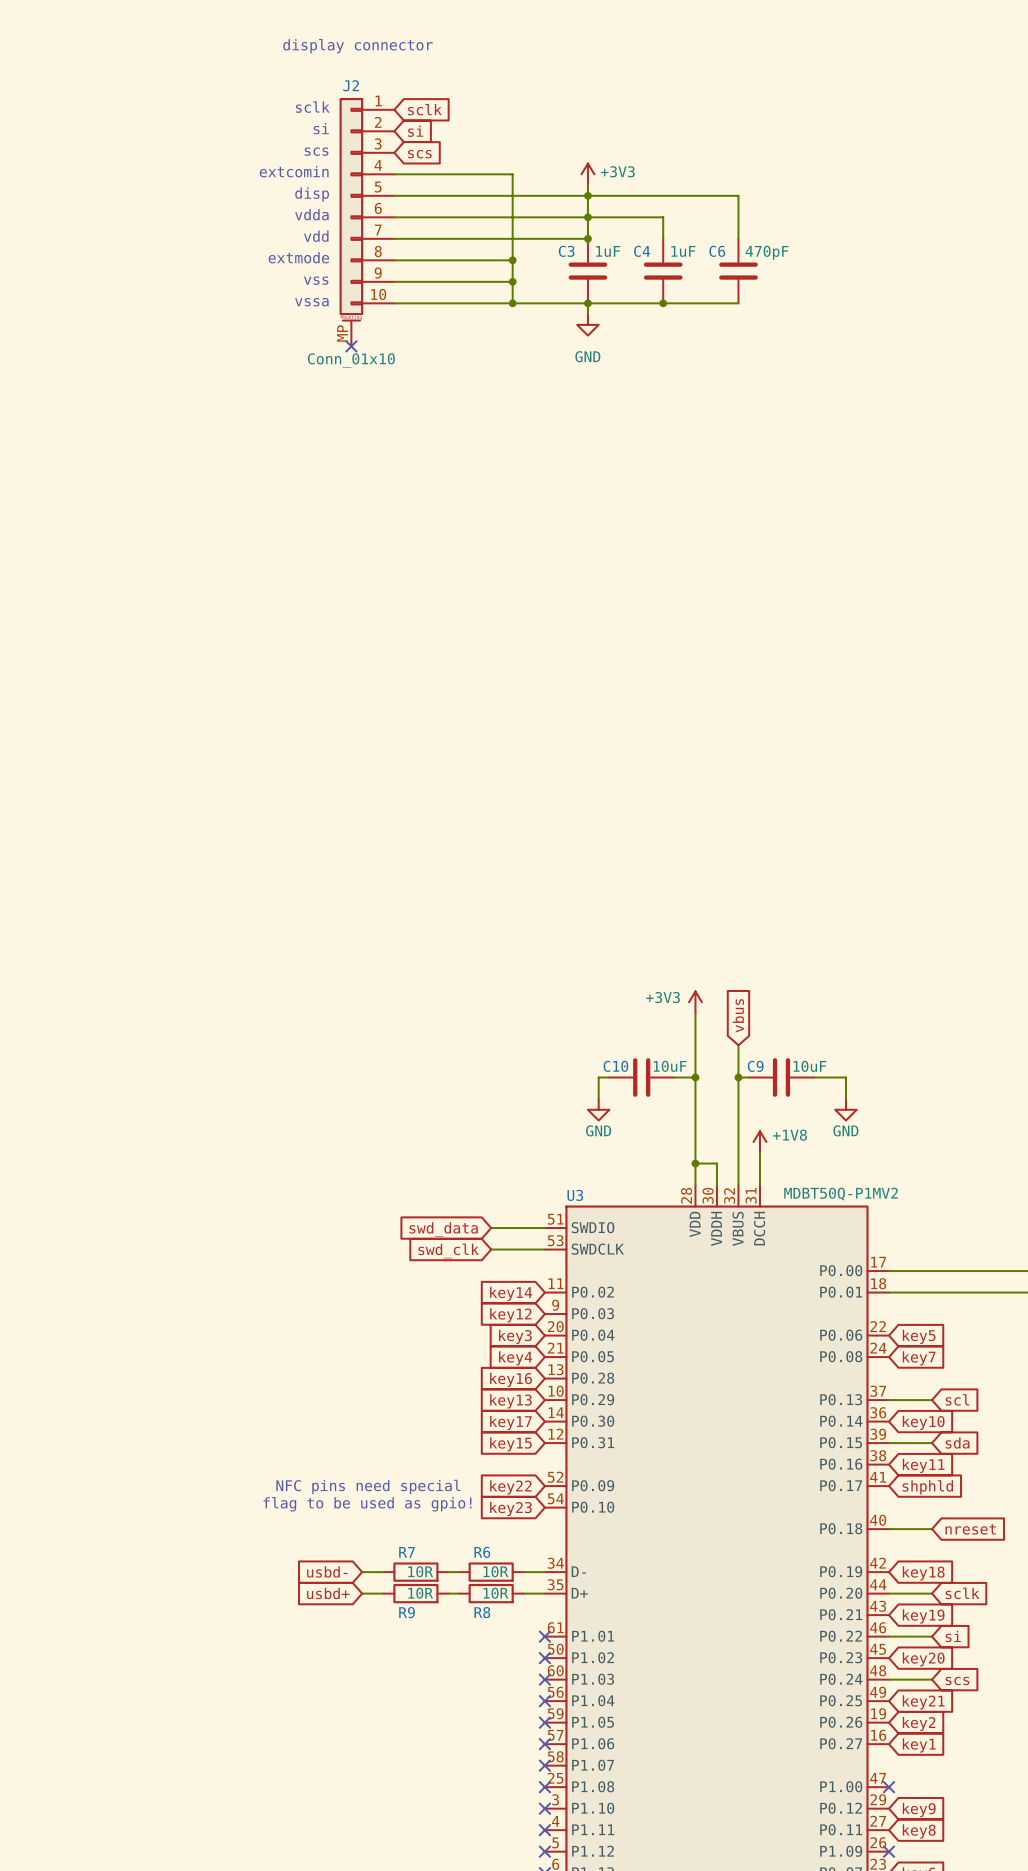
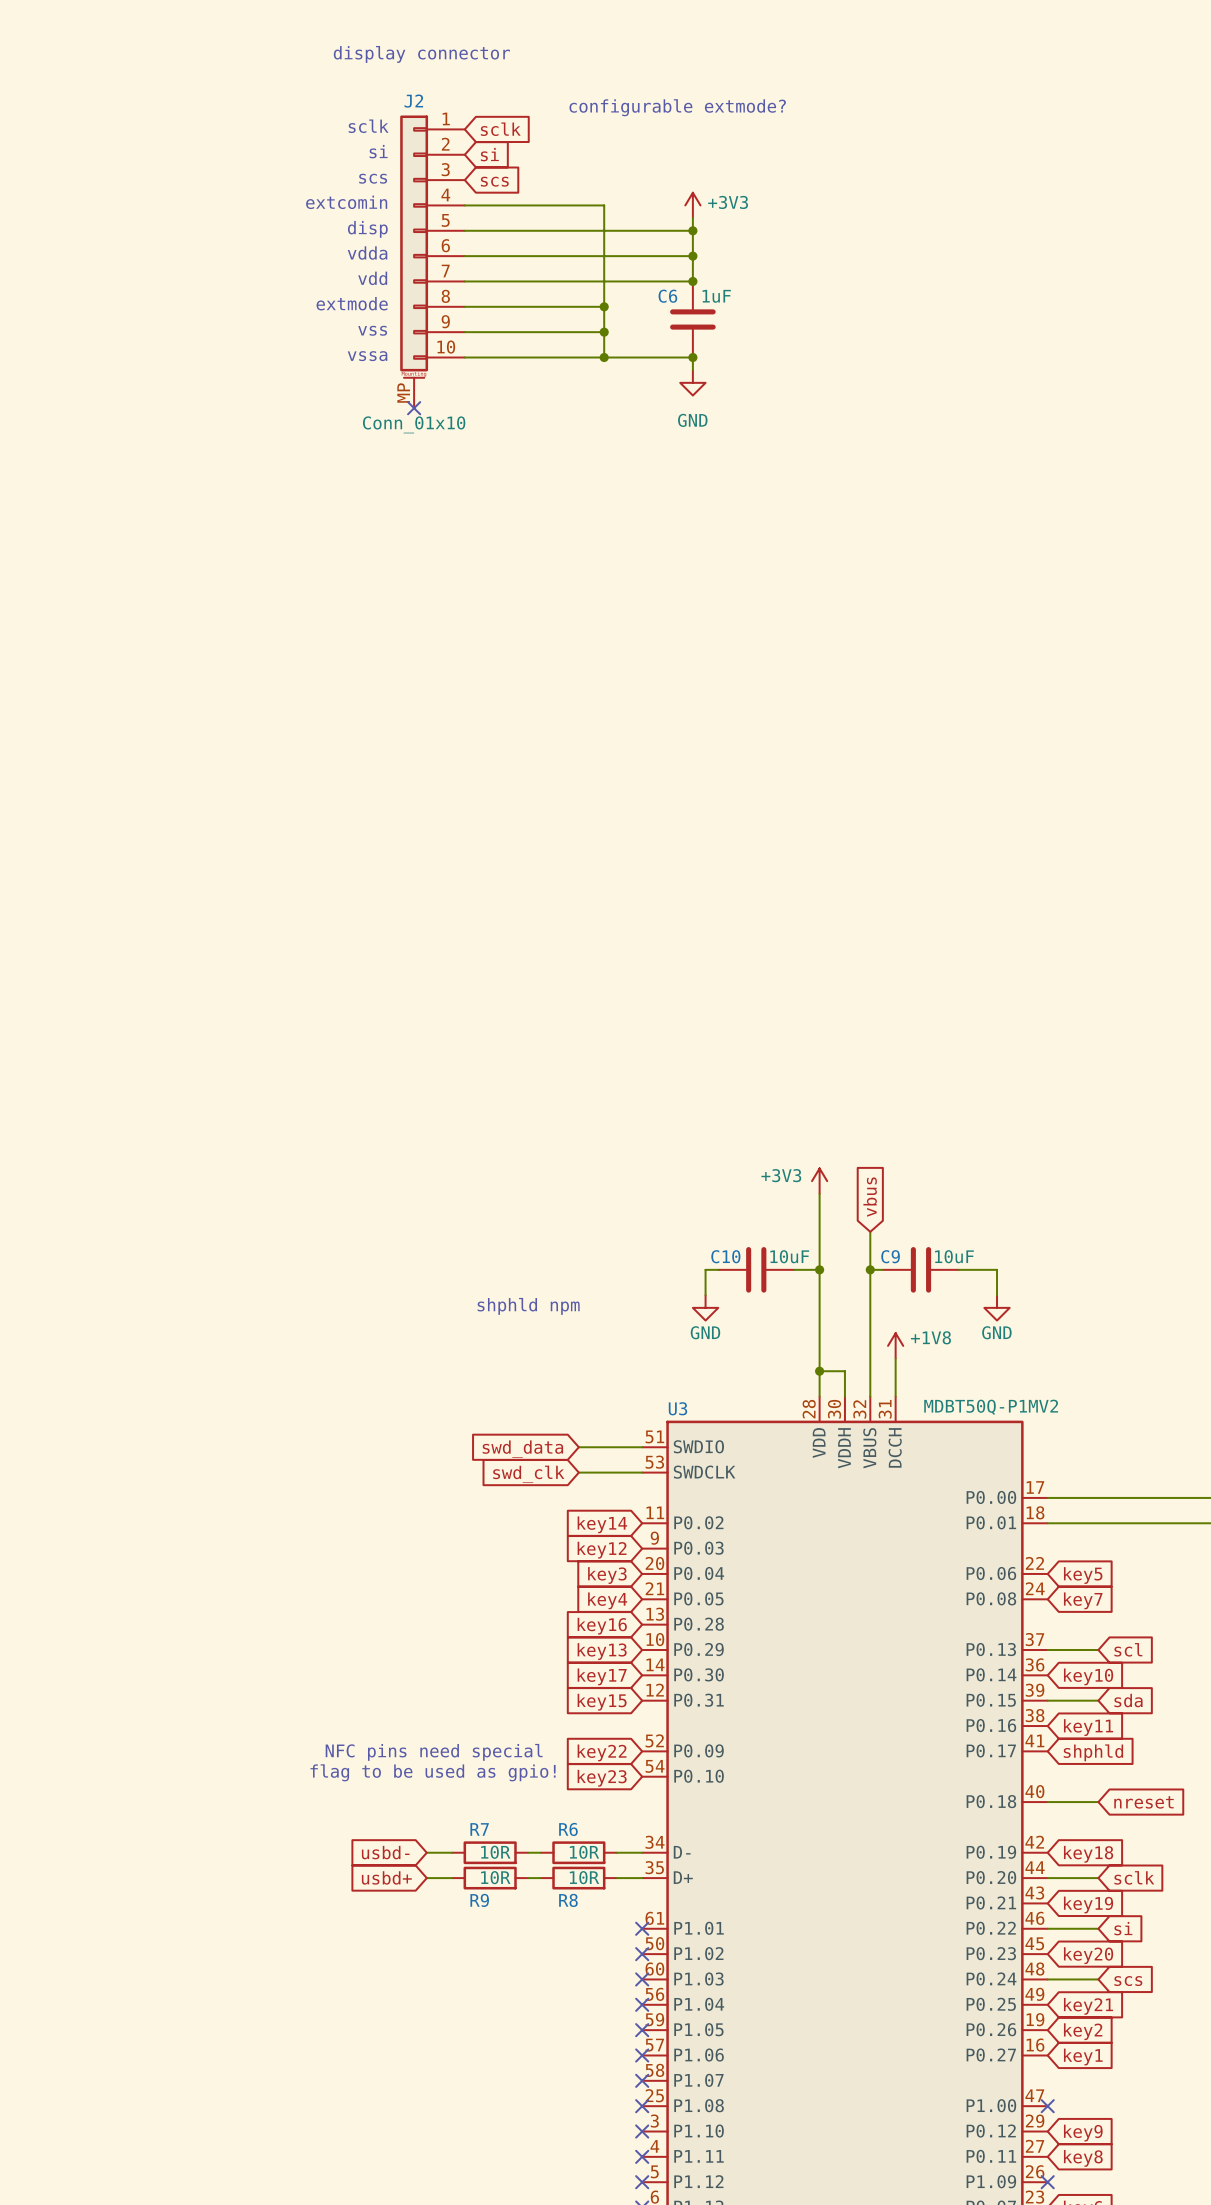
text: none -> configurable extmode? (677, 107)
wire: (587, 195) (738, 195) (738, 238) -> none
wire: (587, 217) (663, 217) (663, 238) -> none
C3 name: C3 (566, 251) -> C6 (667, 296)
C4: 1uF (663, 271) -> none
C6: 470pF (738, 271) -> none
wire: (587, 303) (738, 303) -> none
junction: (663, 303) -> none
text: none -> shphld npm (528, 1306)

